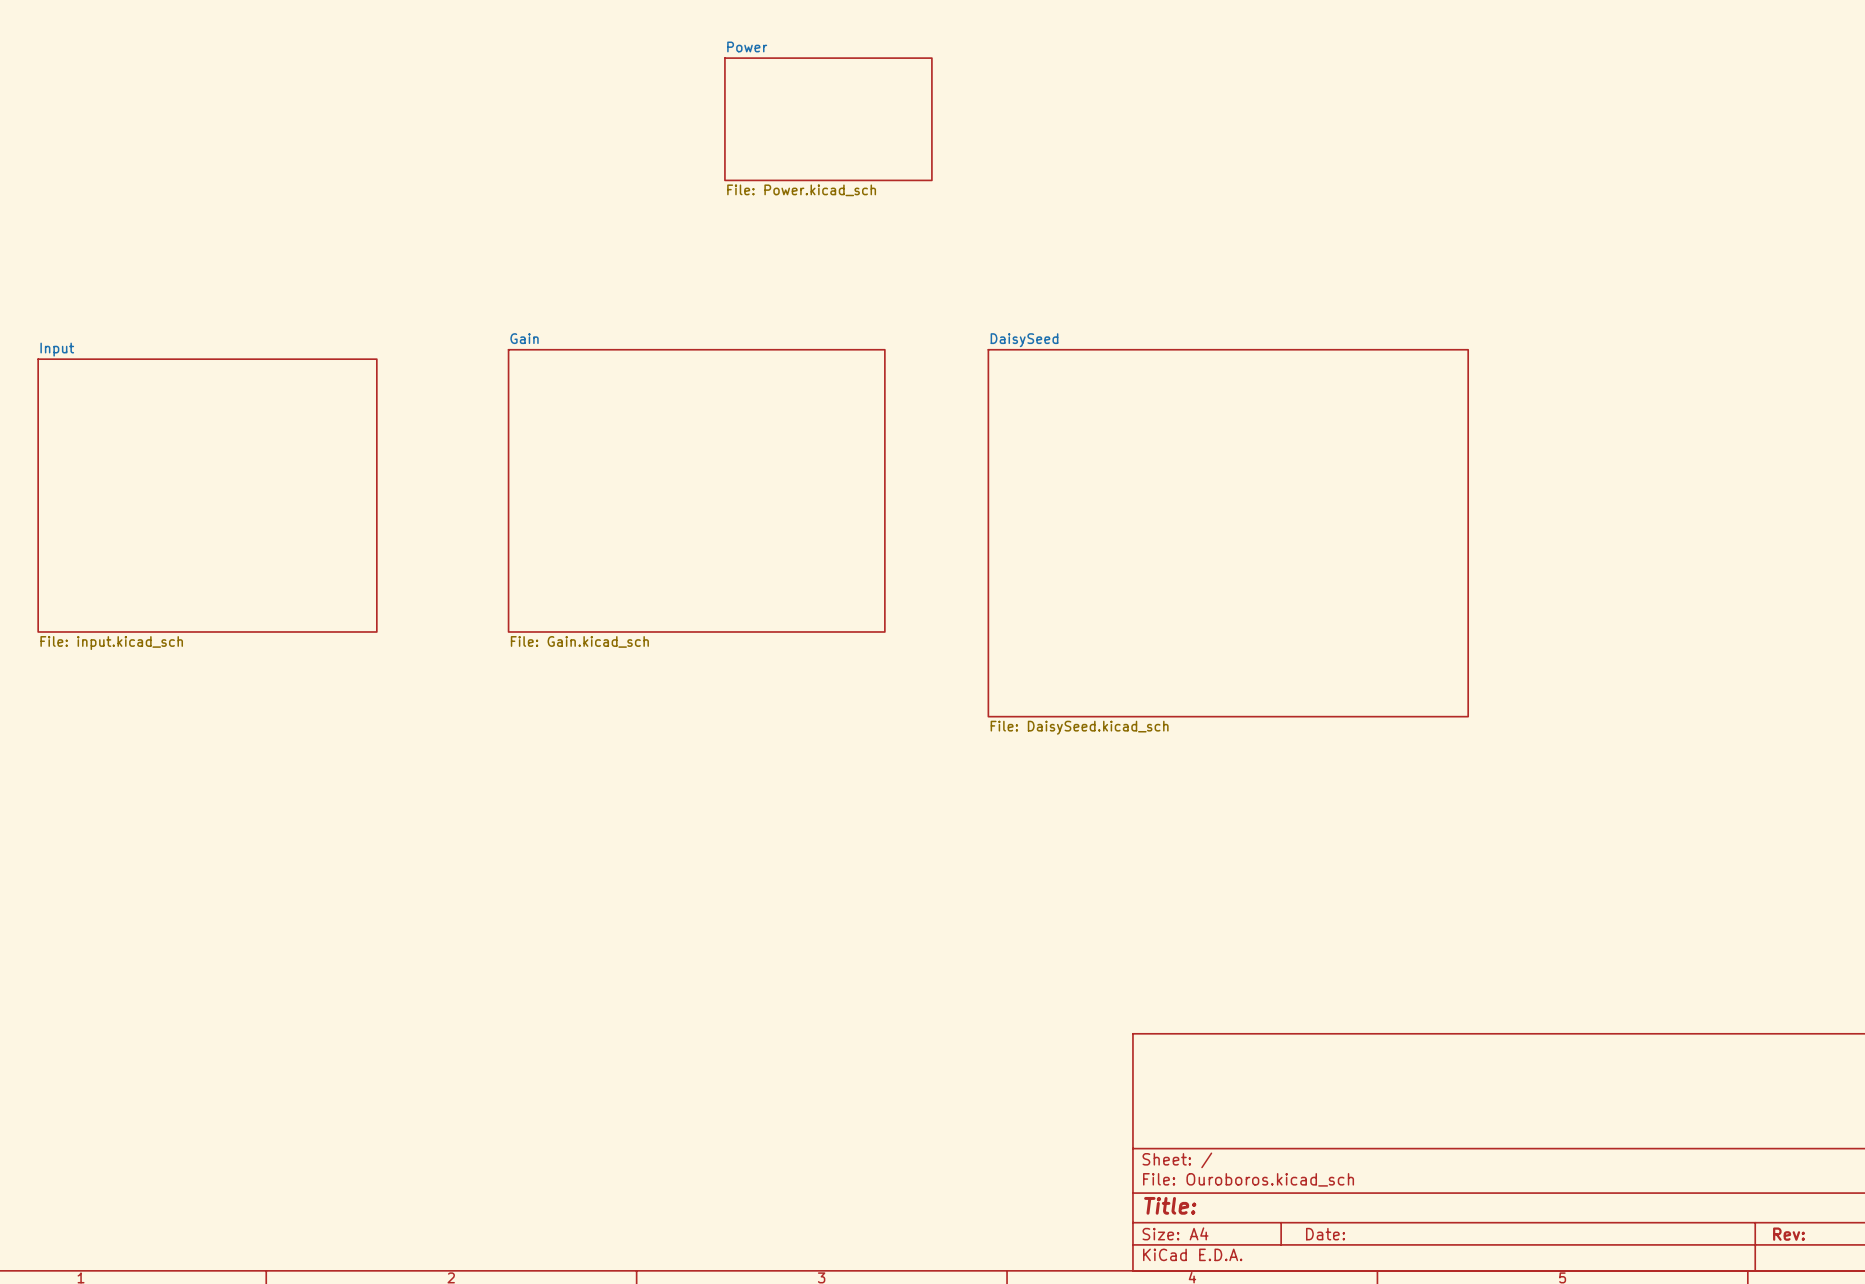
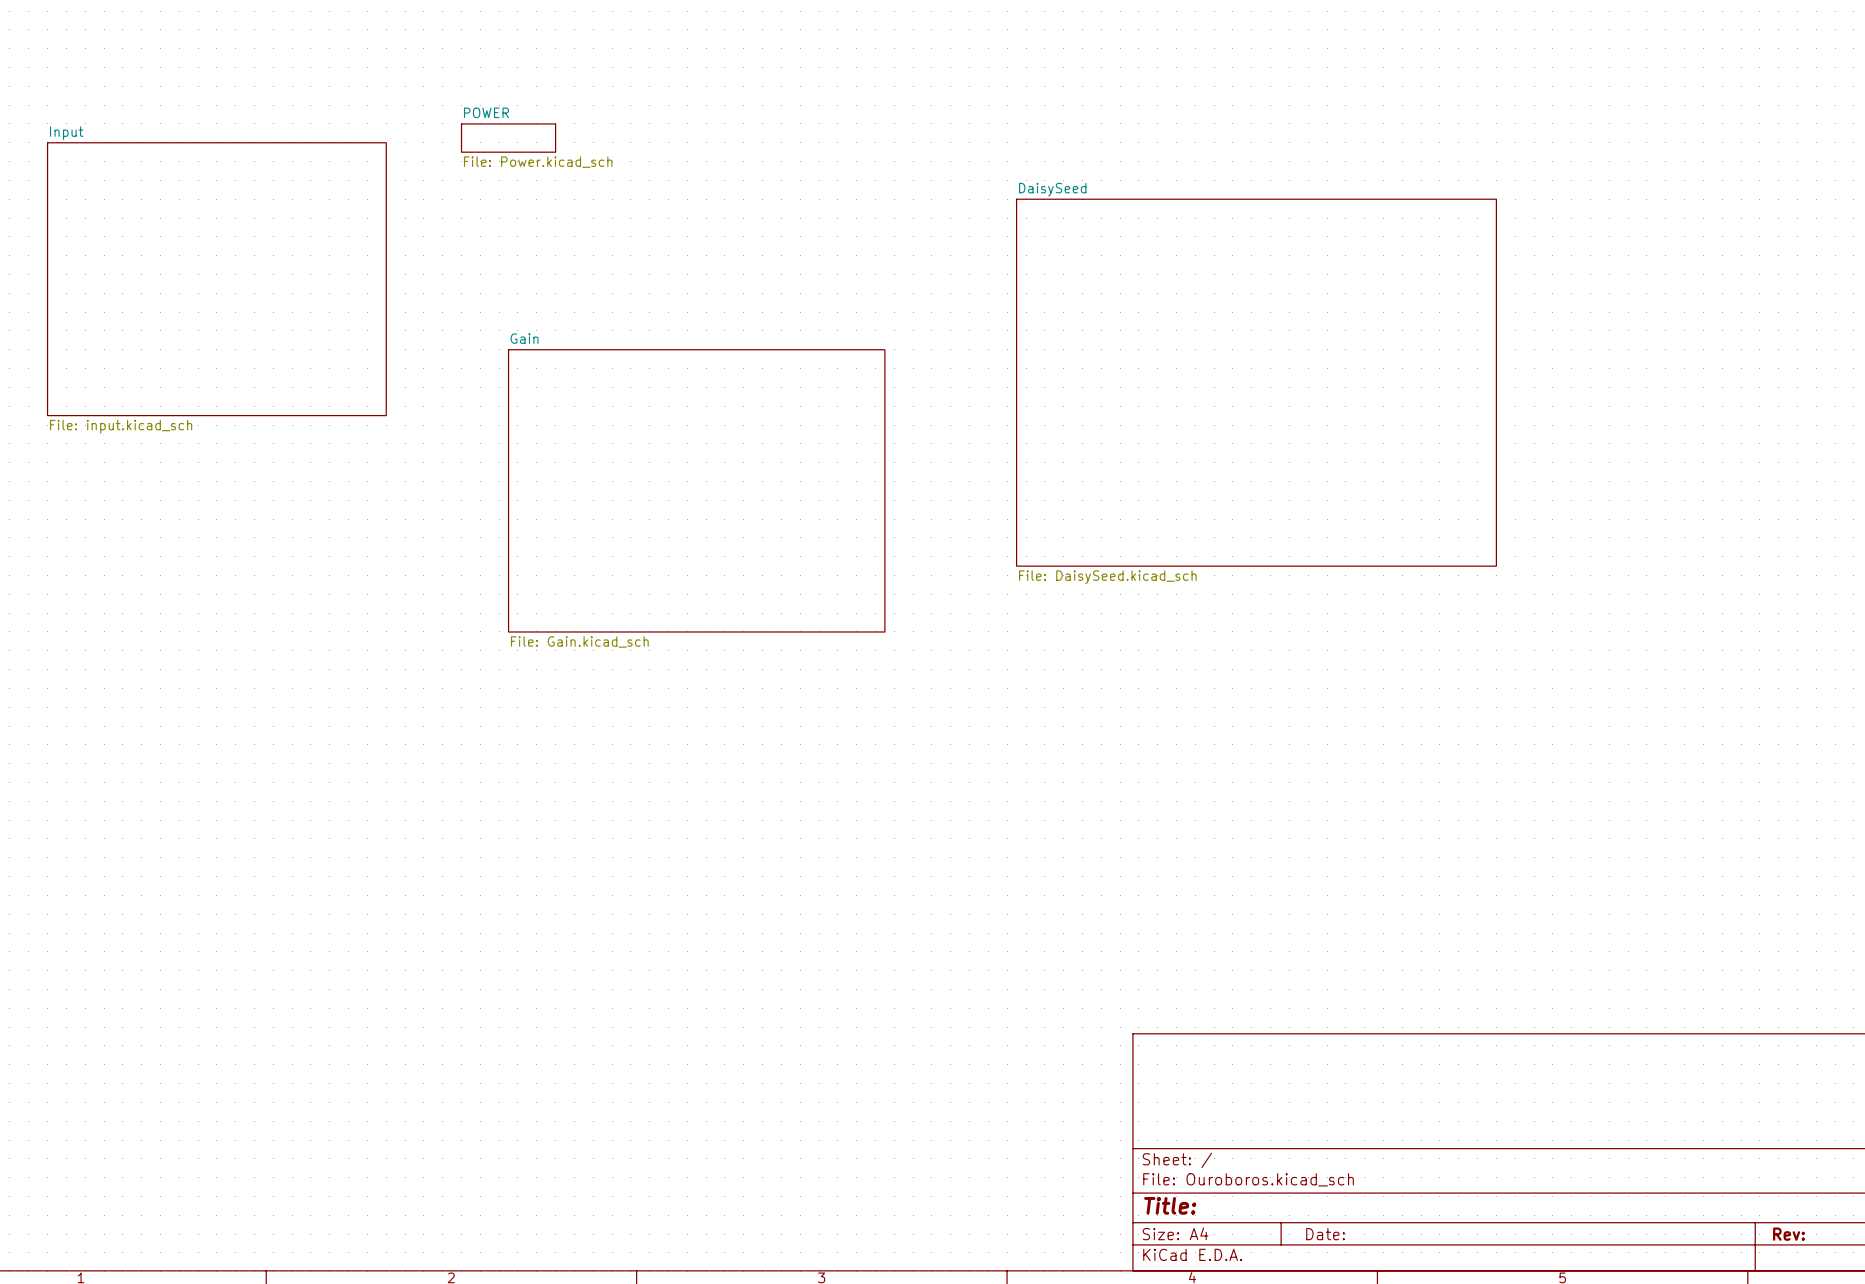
sheet Power: File: Power.kicad_sch (828, 119) -> none
sheet POWER: none -> File: Power.kicad_sch (508, 138)
sheet Input: none -> File: input.kicad_sch (216, 279)
sheet Input: File: input.kicad_sch (207, 495) -> none
sheet DaisySeed position: (1228, 533) -> (1256, 382)

